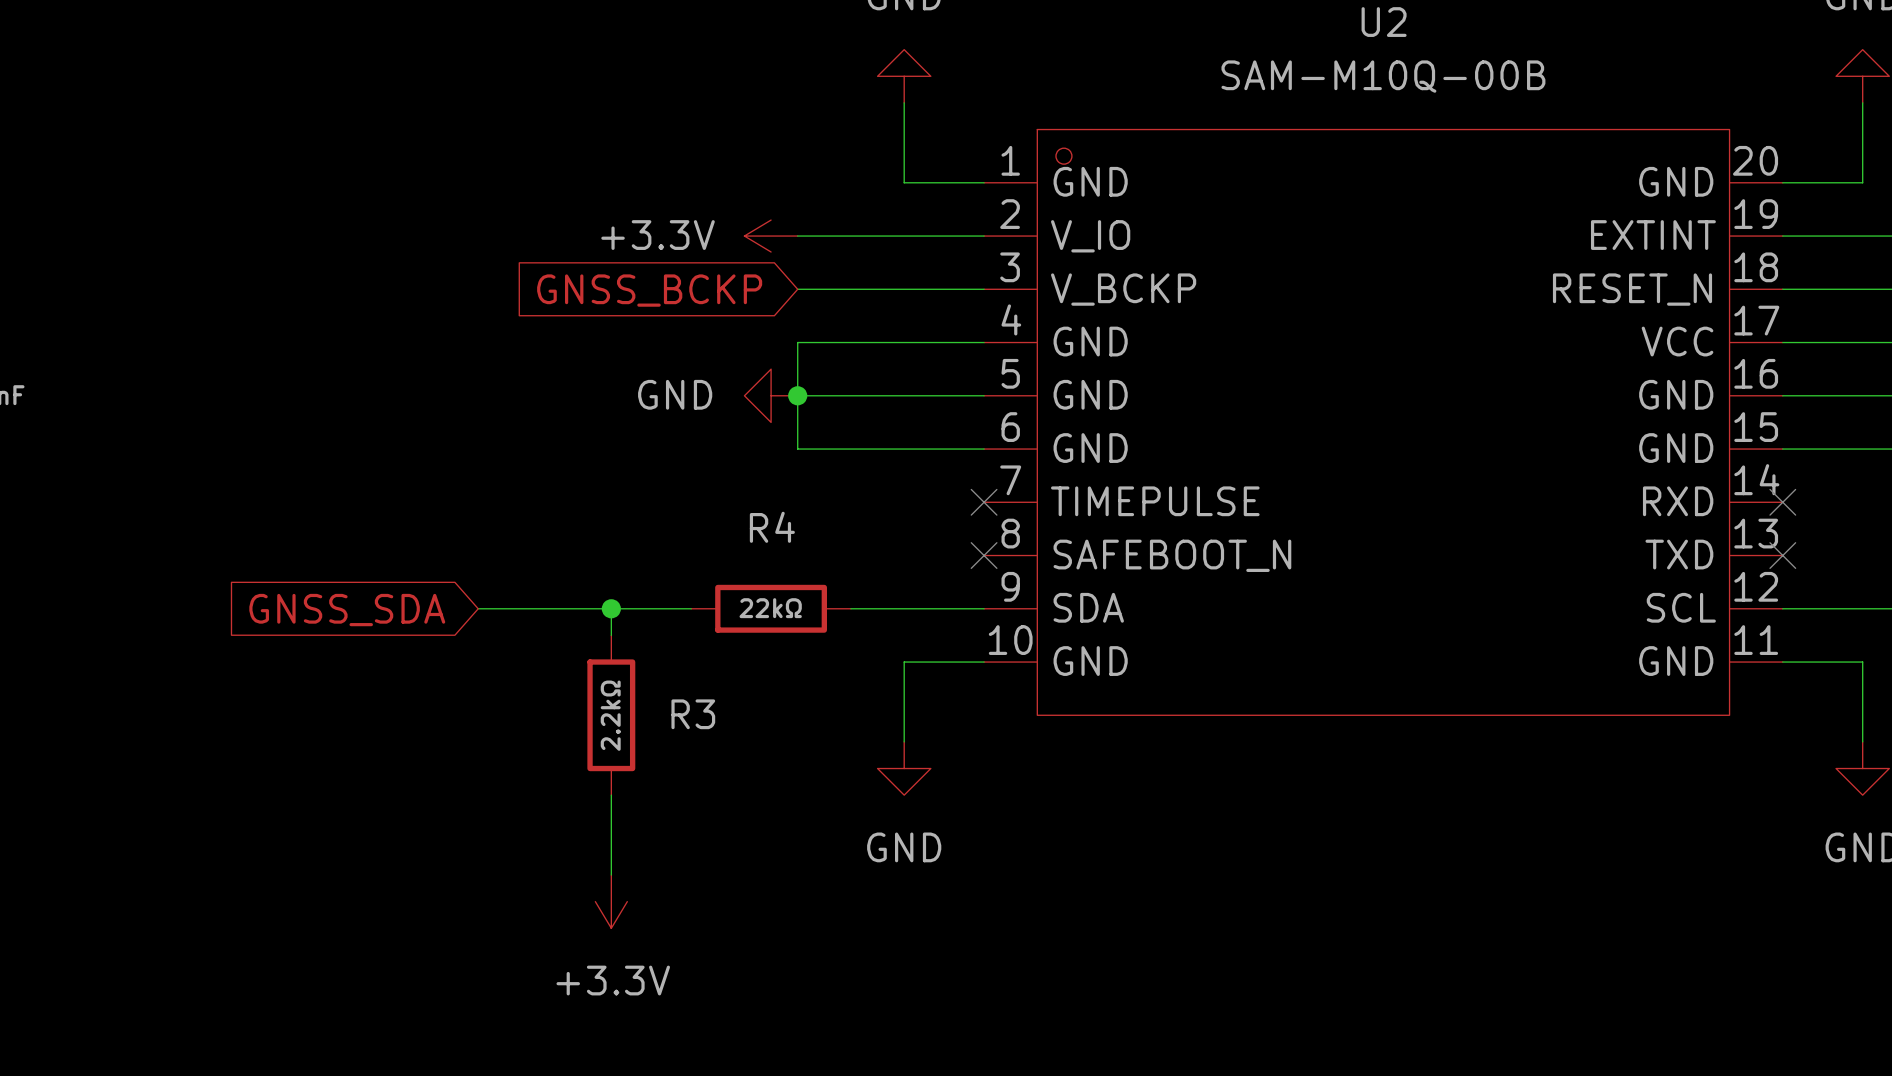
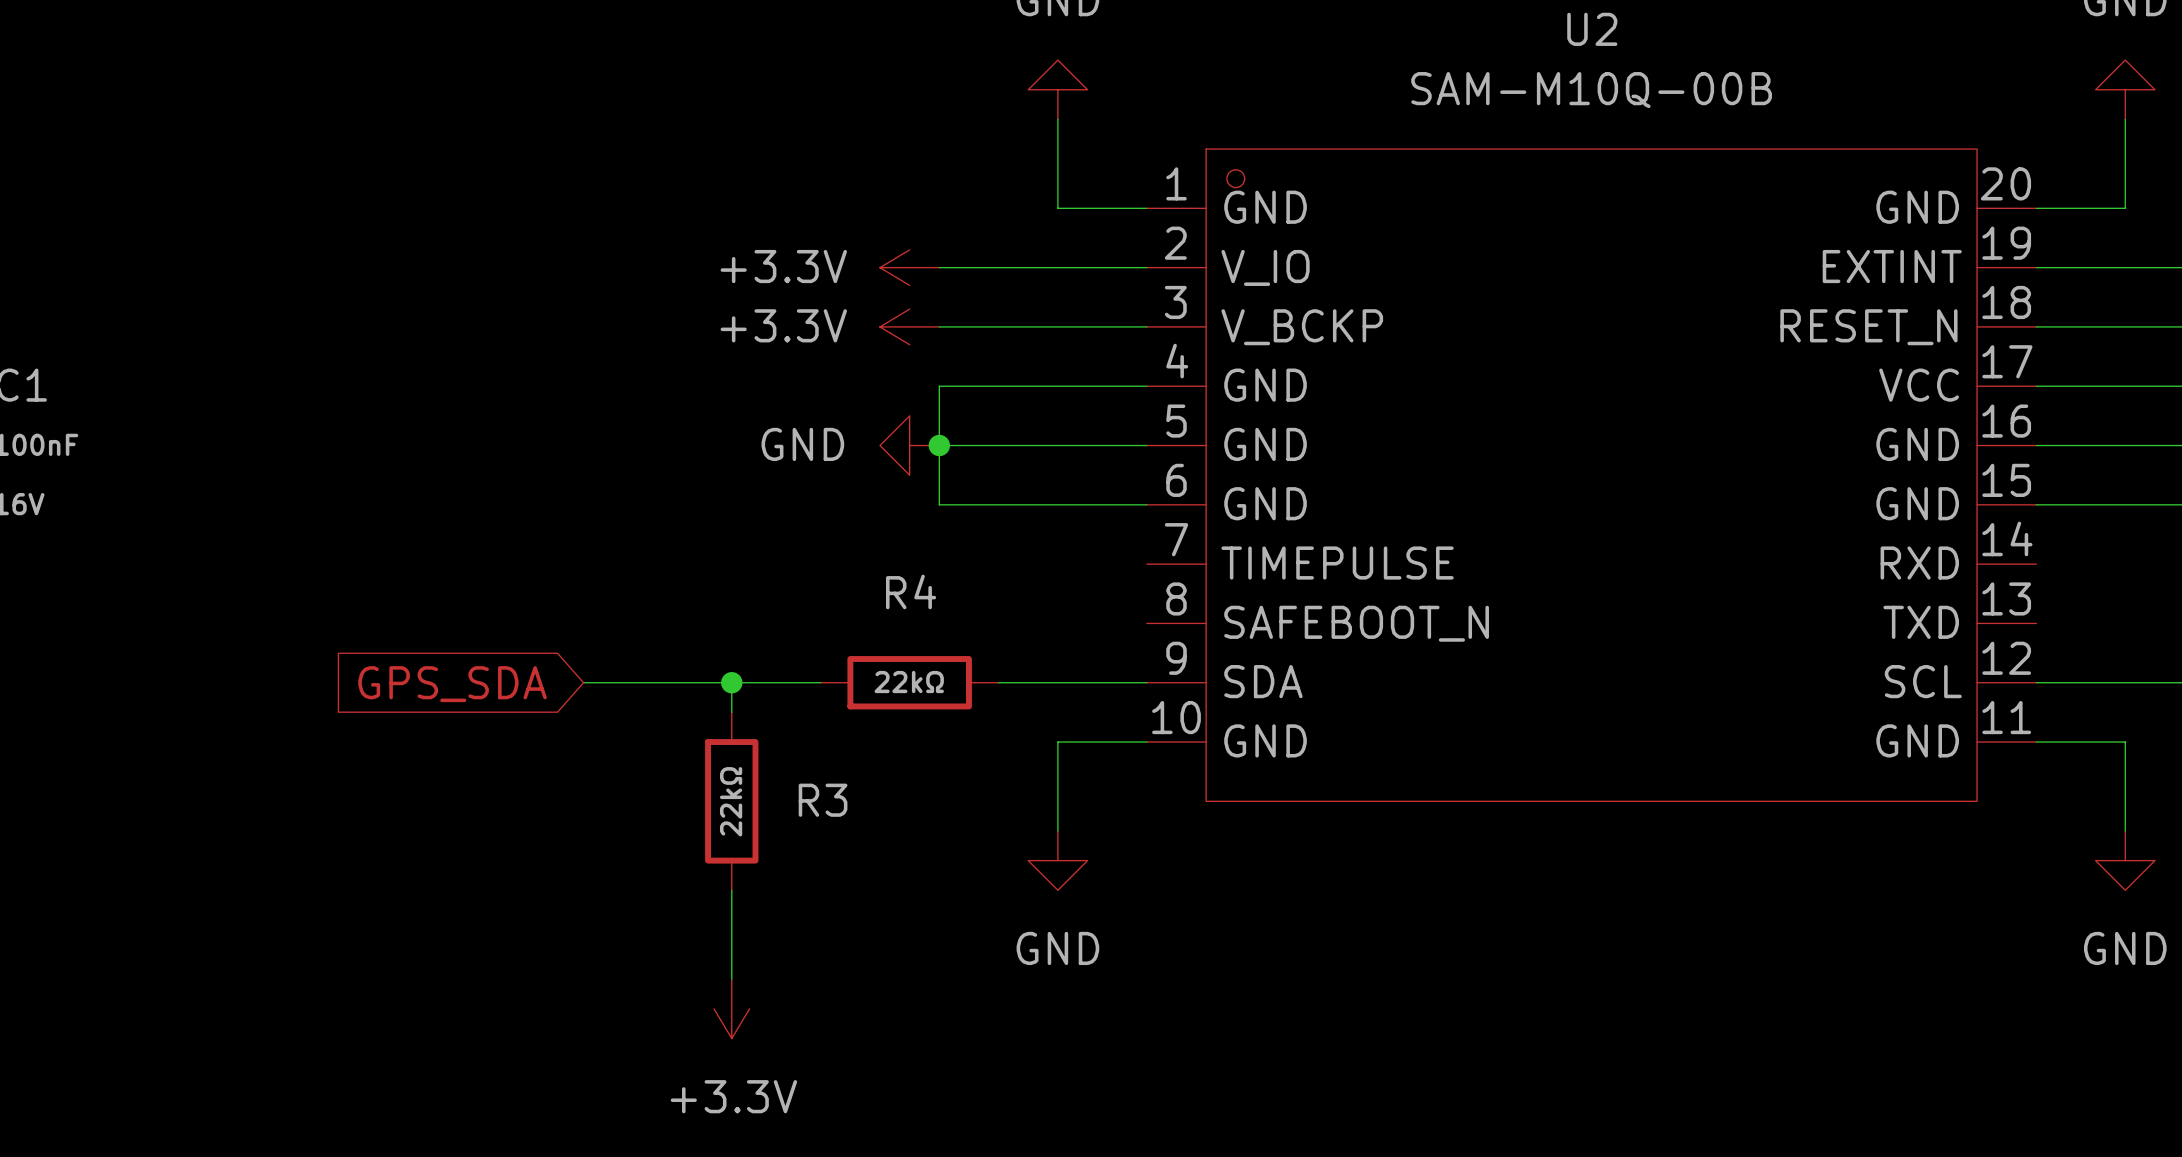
power symbol: none -> +3.3V (909, 326)
global label: GNSS_BCKP (649, 290) -> none
no-connect mark: (984, 502) -> none
no-connect mark: (1782, 502) -> none
no-connect mark: (984, 555) -> none
no-connect mark: (1782, 555) -> none
global label: GNSS_SDA (347, 610) -> GPS_SDA (452, 684)
R3 value: 2.2kΩ (610, 715) -> 22kΩ (731, 801)

